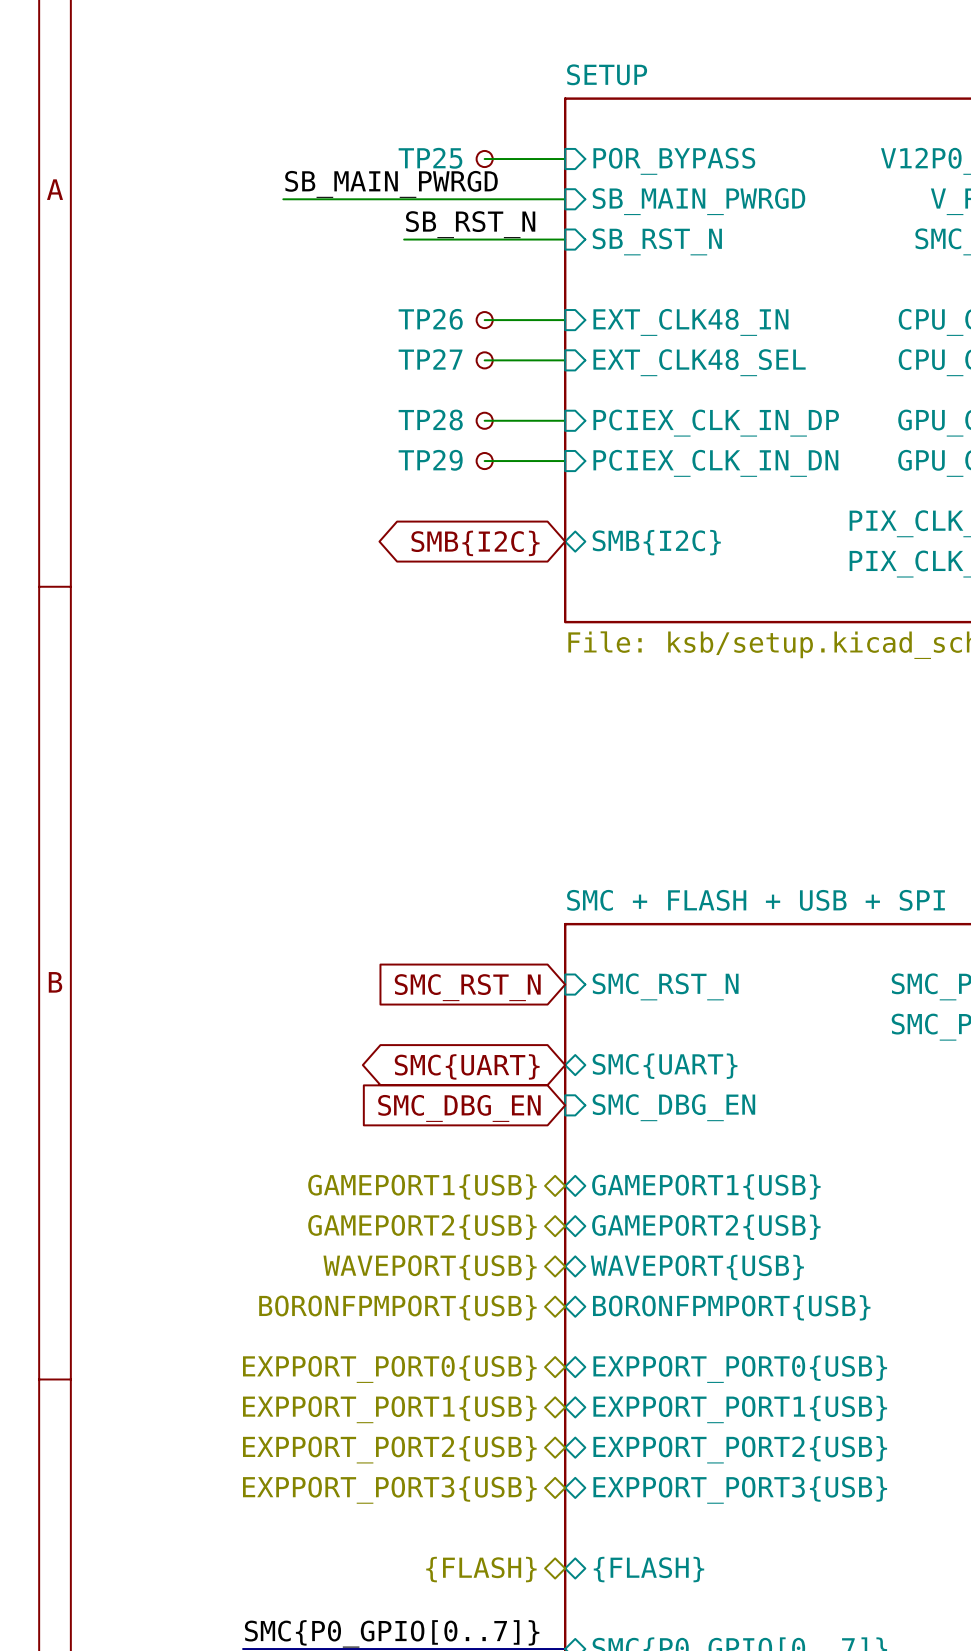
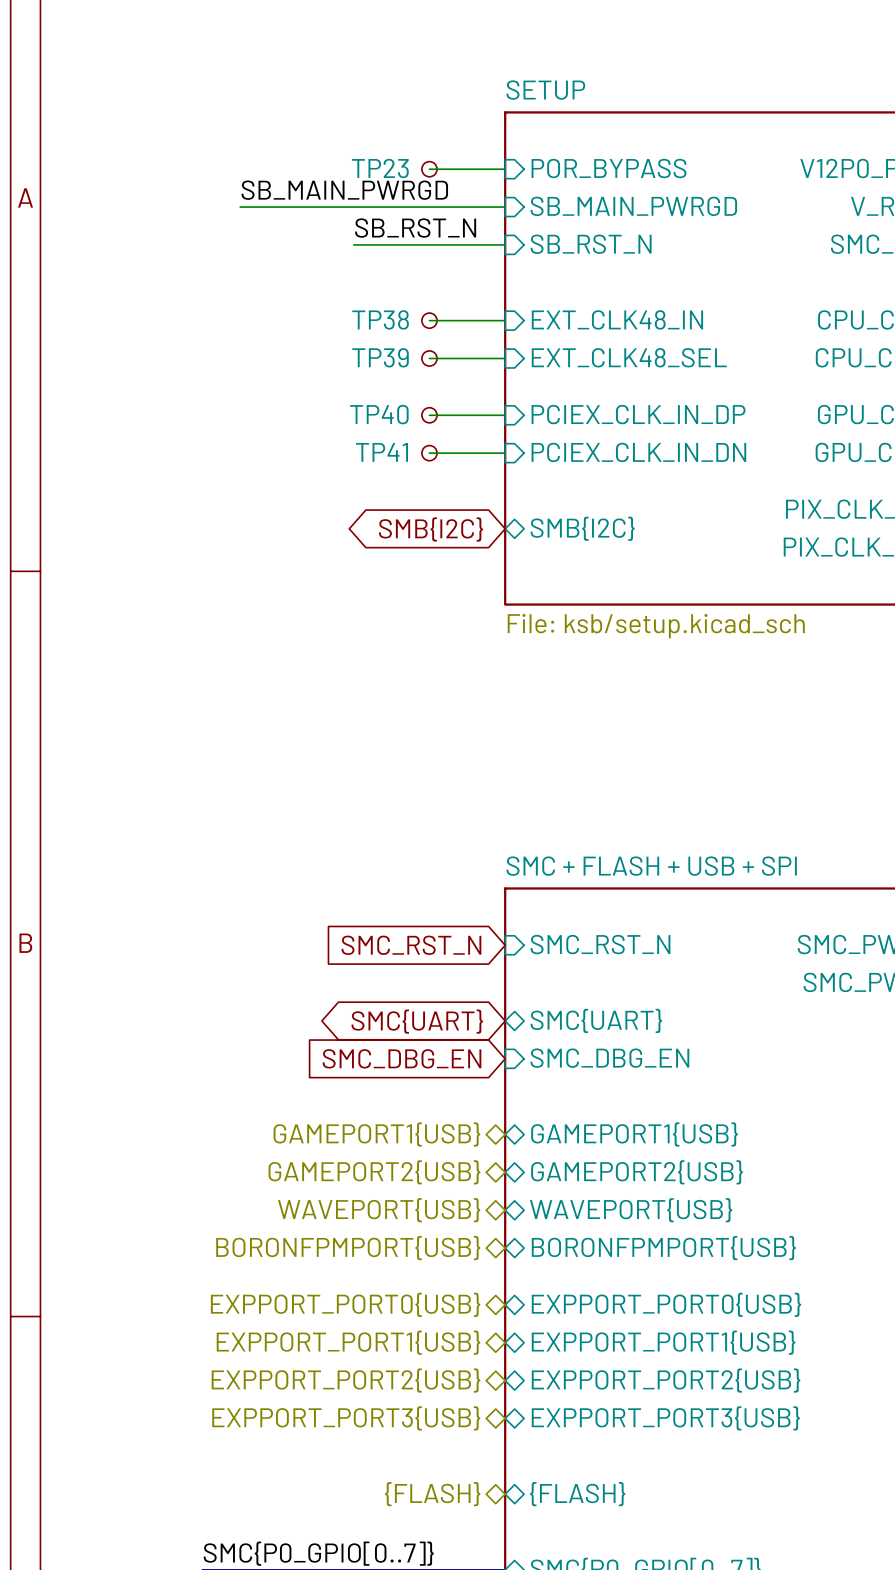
TP25 name: TP25 (430, 158) -> TP23 (380, 168)
TP26 name: TP26 (430, 319) -> TP38 (380, 319)
TP27 name: TP27 (430, 359) -> TP39 (380, 357)
TP28 name: TP28 (430, 420) -> TP40 (379, 414)
TP29 name: TP29 (430, 460) -> TP41 (381, 452)

